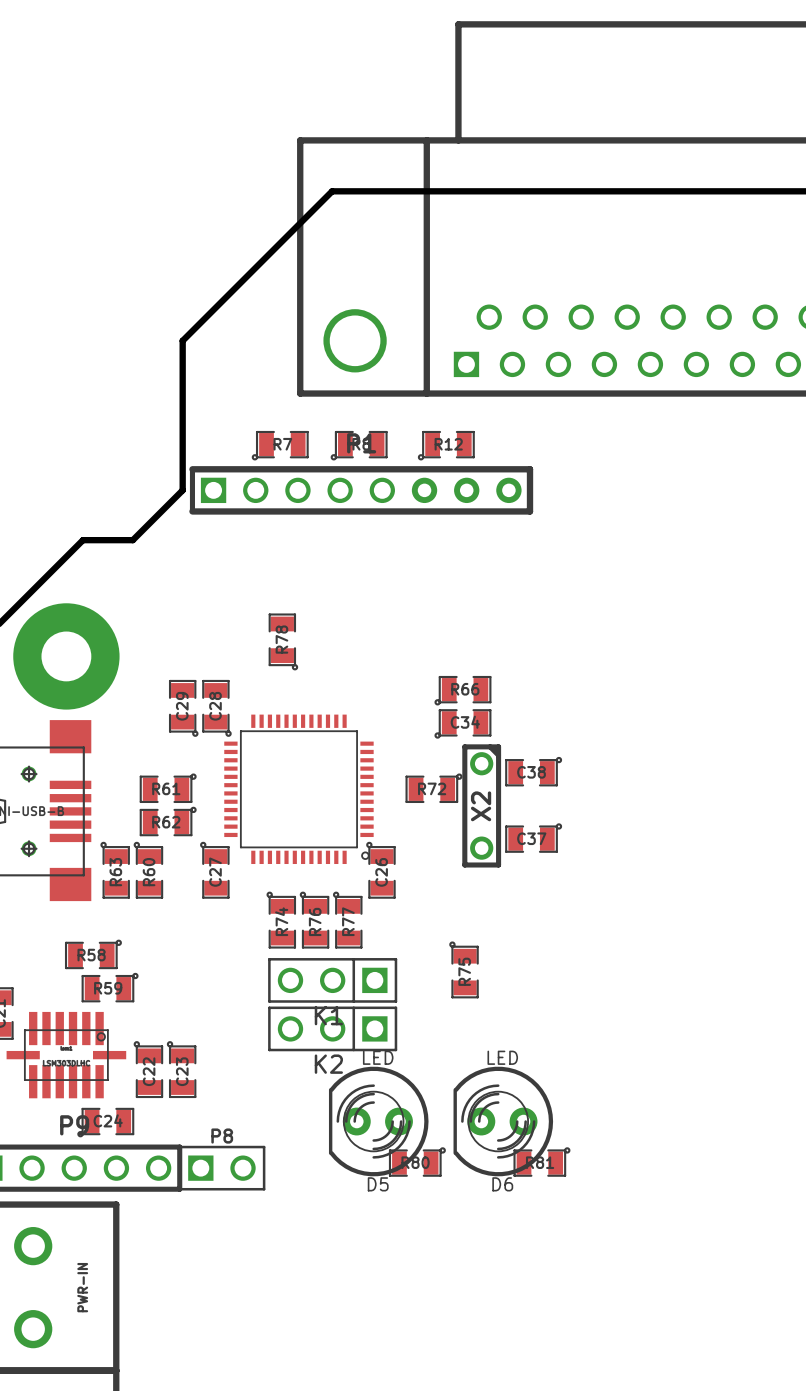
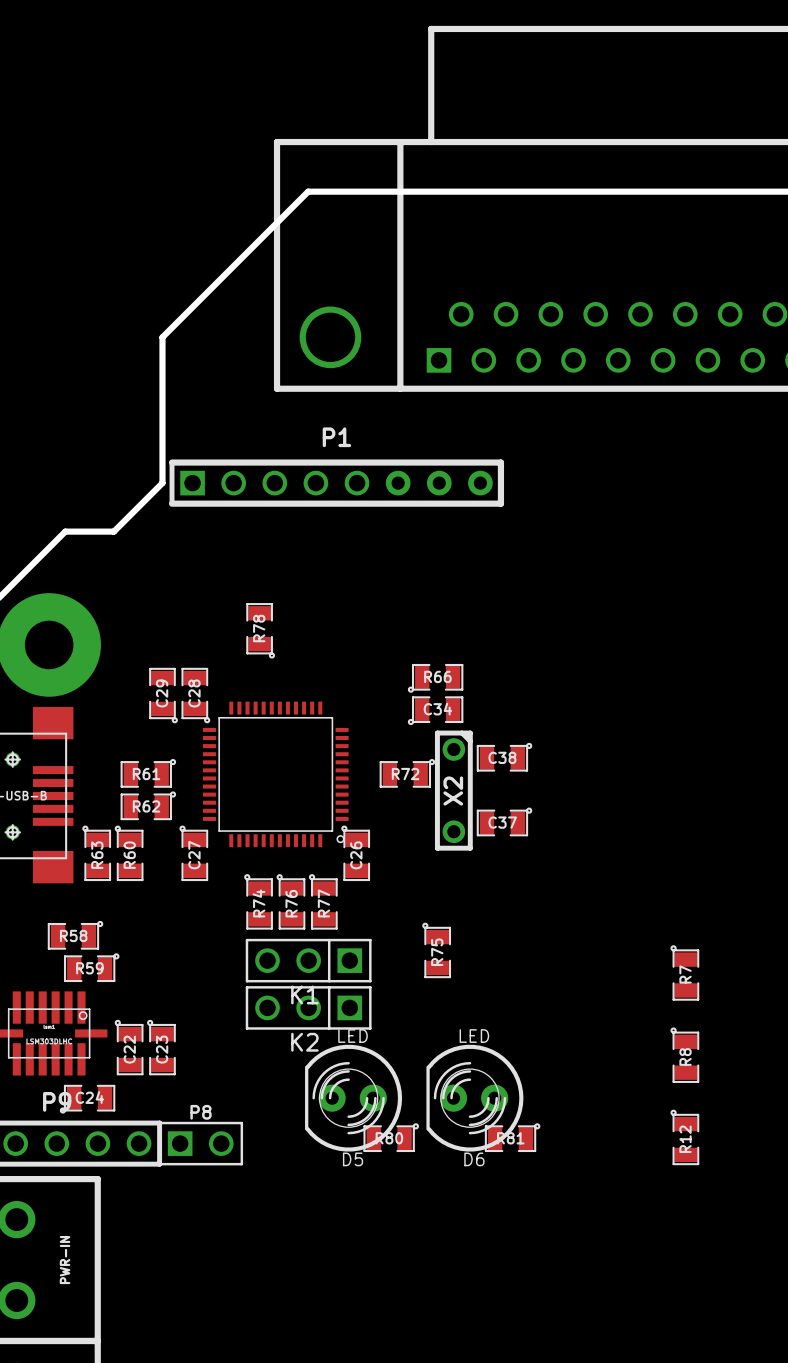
R7 rotation: 0° (280, 445) -> 90° clockwise (684, 972)
R7 position: (280, 445) -> (684, 972)
R8 rotation: 0° (359, 445) -> 90° clockwise (684, 1055)
R8 position: (359, 445) -> (684, 1055)
R12 rotation: 0° (446, 445) -> 90° clockwise (684, 1137)
R12 position: (446, 445) -> (684, 1137)

